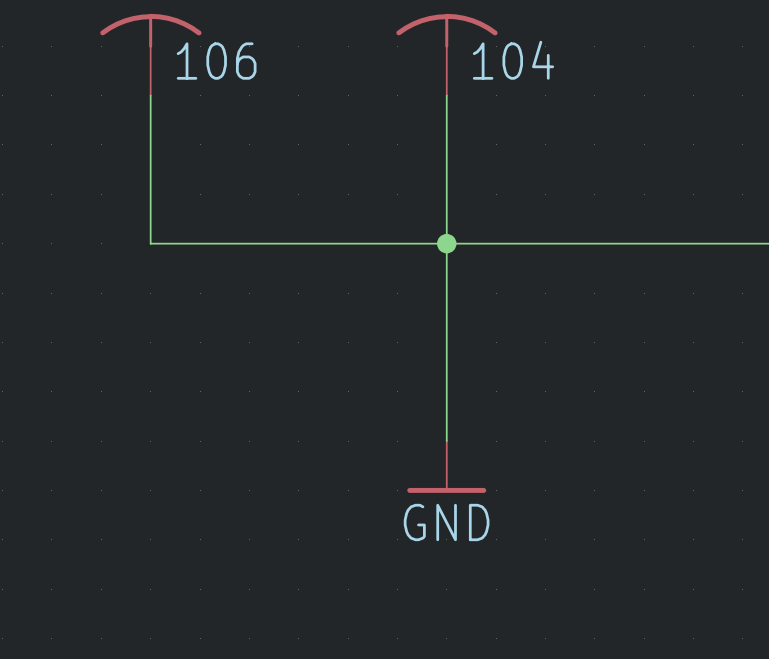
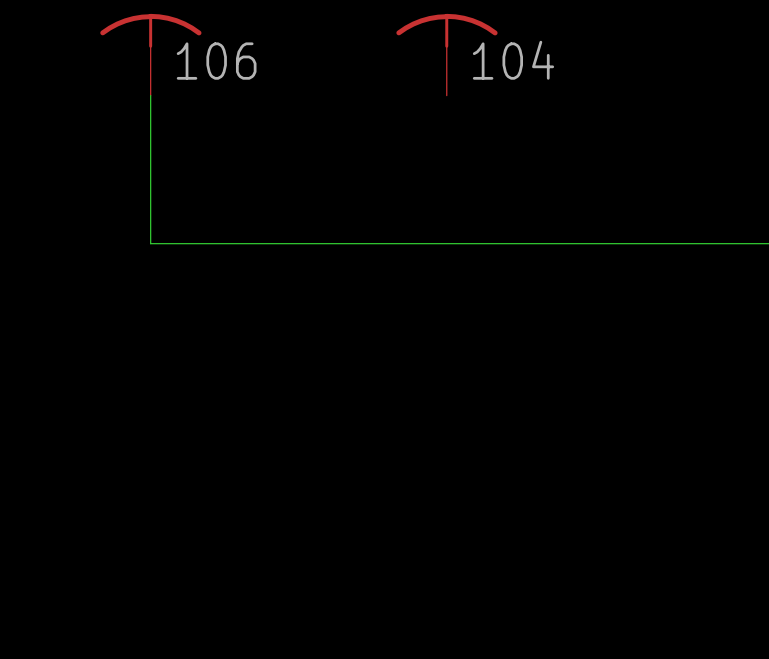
wire: (446, 95) (446, 441) -> none
junction: (446, 243) -> none
power symbol: GND (446, 466) -> none

